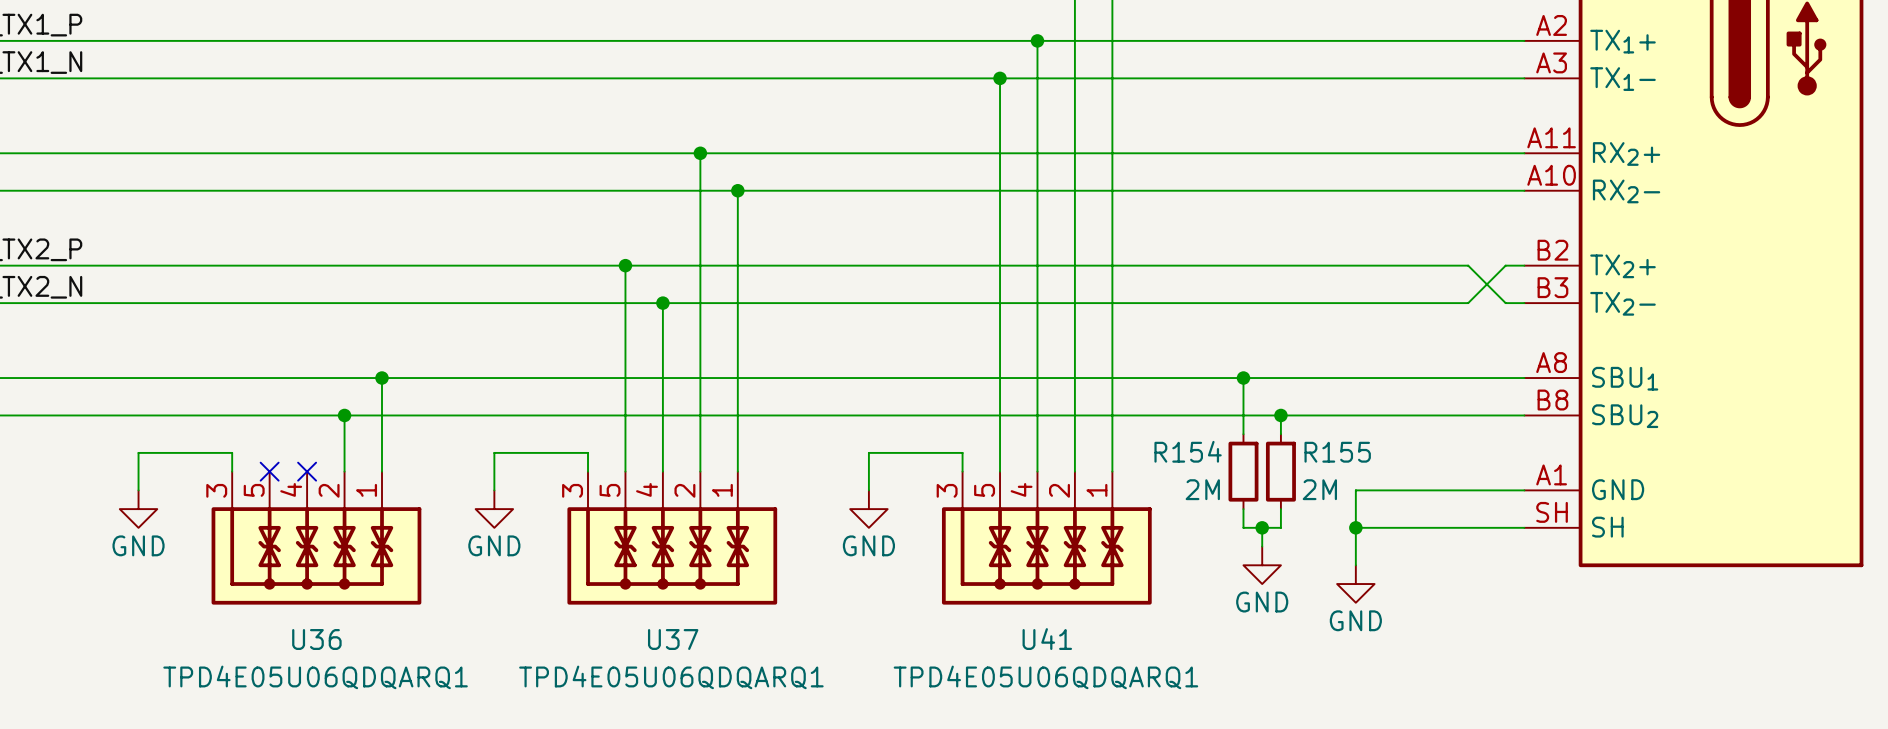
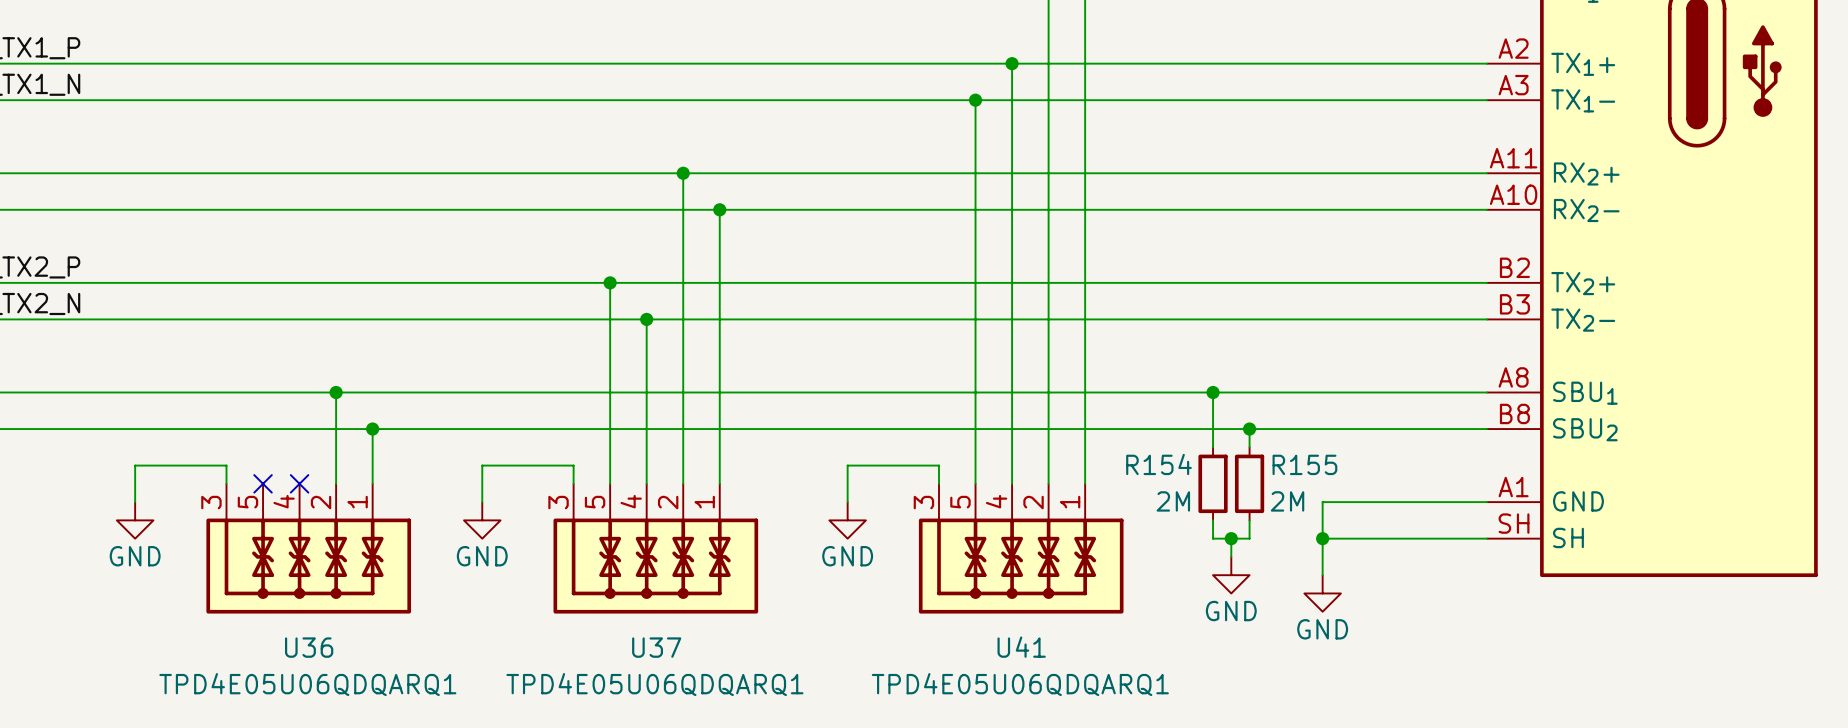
wire: (1468, 265) (1505, 303) -> (1432, 282) (1468, 282)
wire: (1505, 265) (1468, 303) -> (1468, 319) (1432, 319)
junction: none -> (336, 392)
wire: (382, 378) (382, 415) -> (336, 392) (336, 429)
junction: (382, 378) -> none
junction: (344, 415) -> none
junction: none -> (372, 429)

